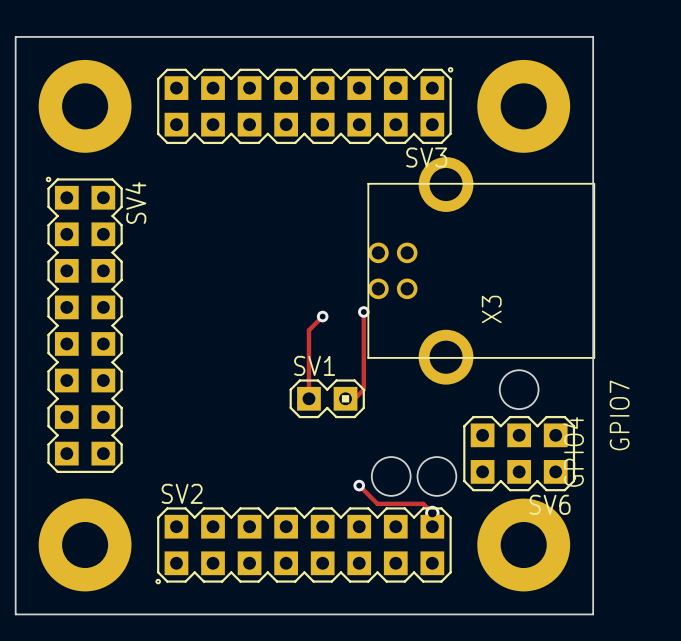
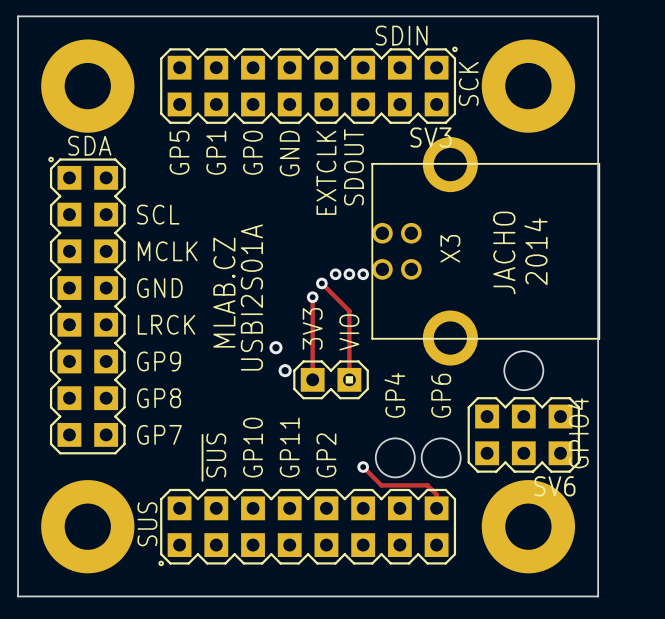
text: none -> SDIN (401, 35)
text: none -> SCK (468, 83)
text: none -> SDA (89, 145)
text: none -> GP5 (179, 152)
text: none -> GP1 (216, 152)
text: none -> GP0 (253, 152)
text: none -> GND (289, 153)
text: none -> SDOUT (353, 167)
text: none -> EXTCLK (326, 172)
SV4 name: SV4 (135, 203) -> none
text: none -> SCL (158, 214)
text: none -> MCLK (167, 251)
text: none -> 2014 (535, 251)
text: none -> JACHO (504, 252)
via: none -> (335, 274)
via: none -> (349, 274)
via: none -> (363, 274)
via: none -> (321, 283)
text: none -> GND (159, 288)
X3 name position: X3 (491, 309) -> X3 (450, 248)
text: none -> MLAB.CZ (224, 292)
track: (363, 311) (363, 389) (354, 398) (345, 398) -> (321, 283) (349, 310) (349, 379)
via: (363, 311) -> none
text: none -> USBI2S01A (251, 297)
via: none -> (312, 297)
track: (322, 316) (308, 330) -> (312, 297) (312, 310)
via: (322, 316) -> none
text: none -> LRCK (166, 324)
text: none -> 3V3 (312, 328)
text: none -> VIO (349, 332)
SV1 name: SV1 (314, 365) -> none
via: none -> (275, 347)
text: none -> GP9 (159, 361)
via: none -> (285, 370)
text: none -> GP4 (394, 395)
text: none -> GP6 (441, 395)
text: GPIO7 (619, 415) -> none
text: none -> GP8 (159, 398)
text: none -> GP7 (159, 434)
line: none -> (202, 434) (202, 480)
text: none -> GP10 (253, 447)
text: none -> GP11 (289, 447)
text: none -> SUS (216, 455)
text: none -> GP2 (326, 455)
SV2 name: SV2 (182, 493) -> none
via: (432, 513) -> none
text: none -> SUS (147, 524)

